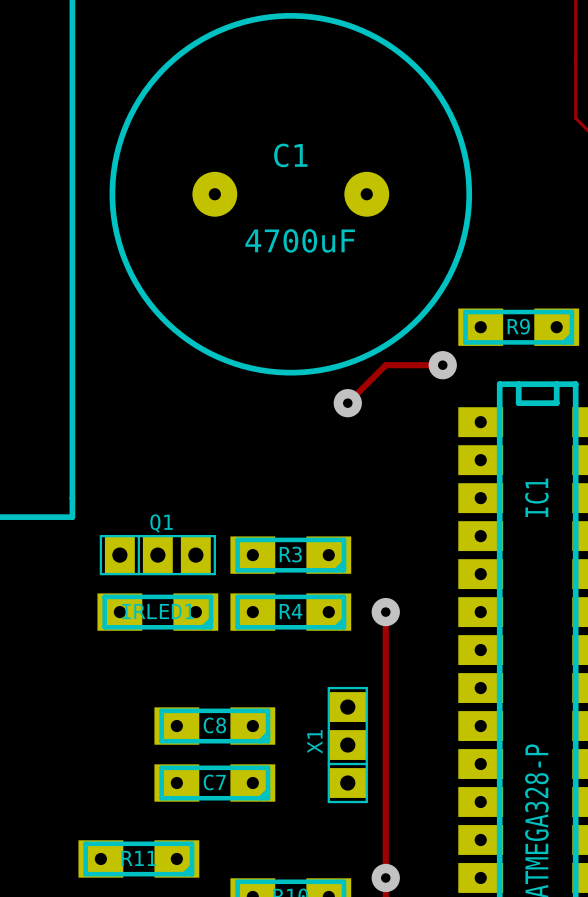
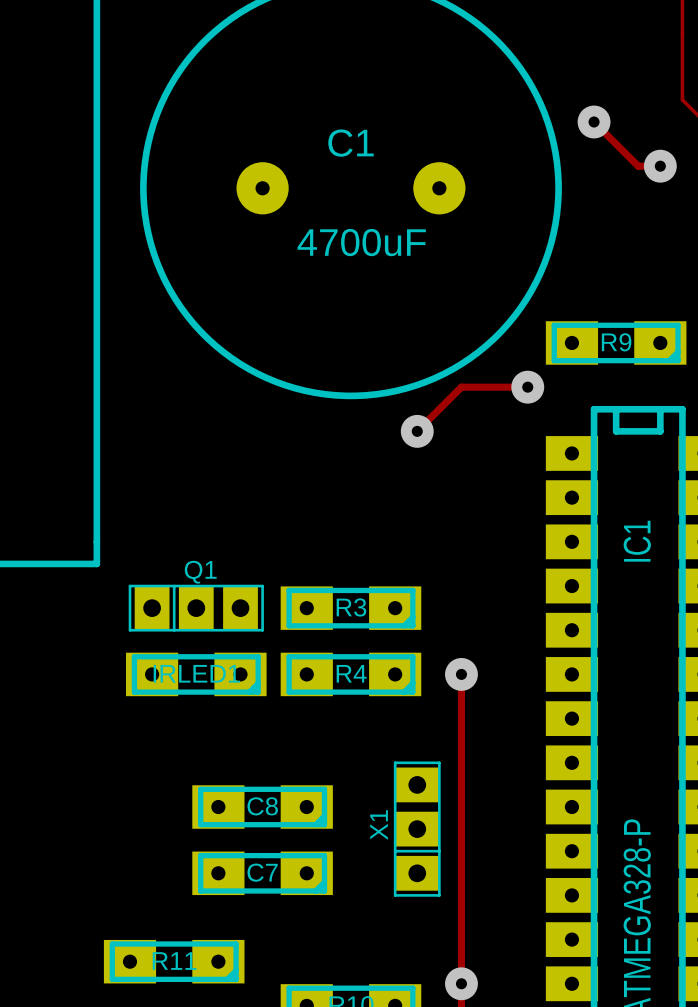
track: none -> (594, 122) (638, 166) (660, 166)
via: none -> (594, 122)
via: none -> (660, 166)

